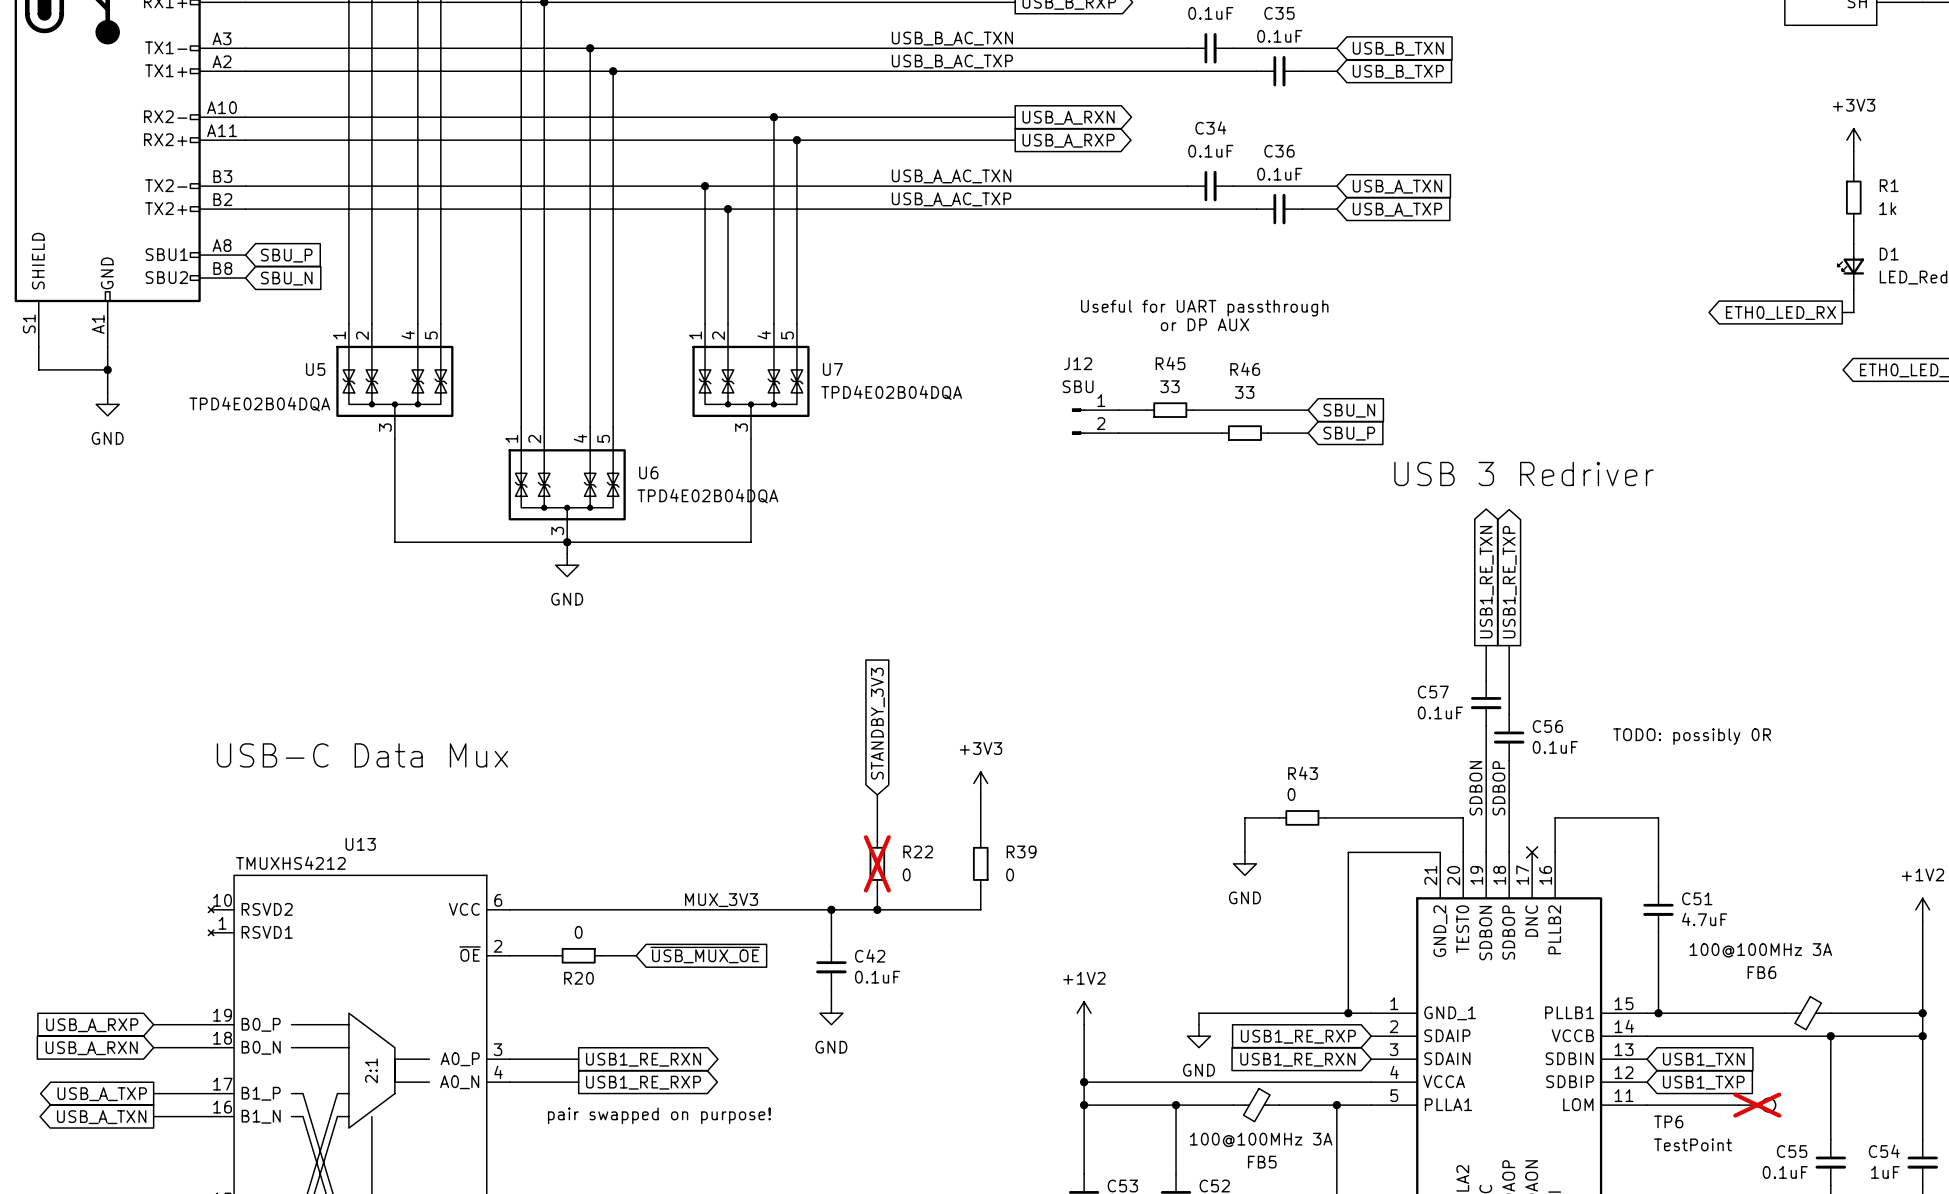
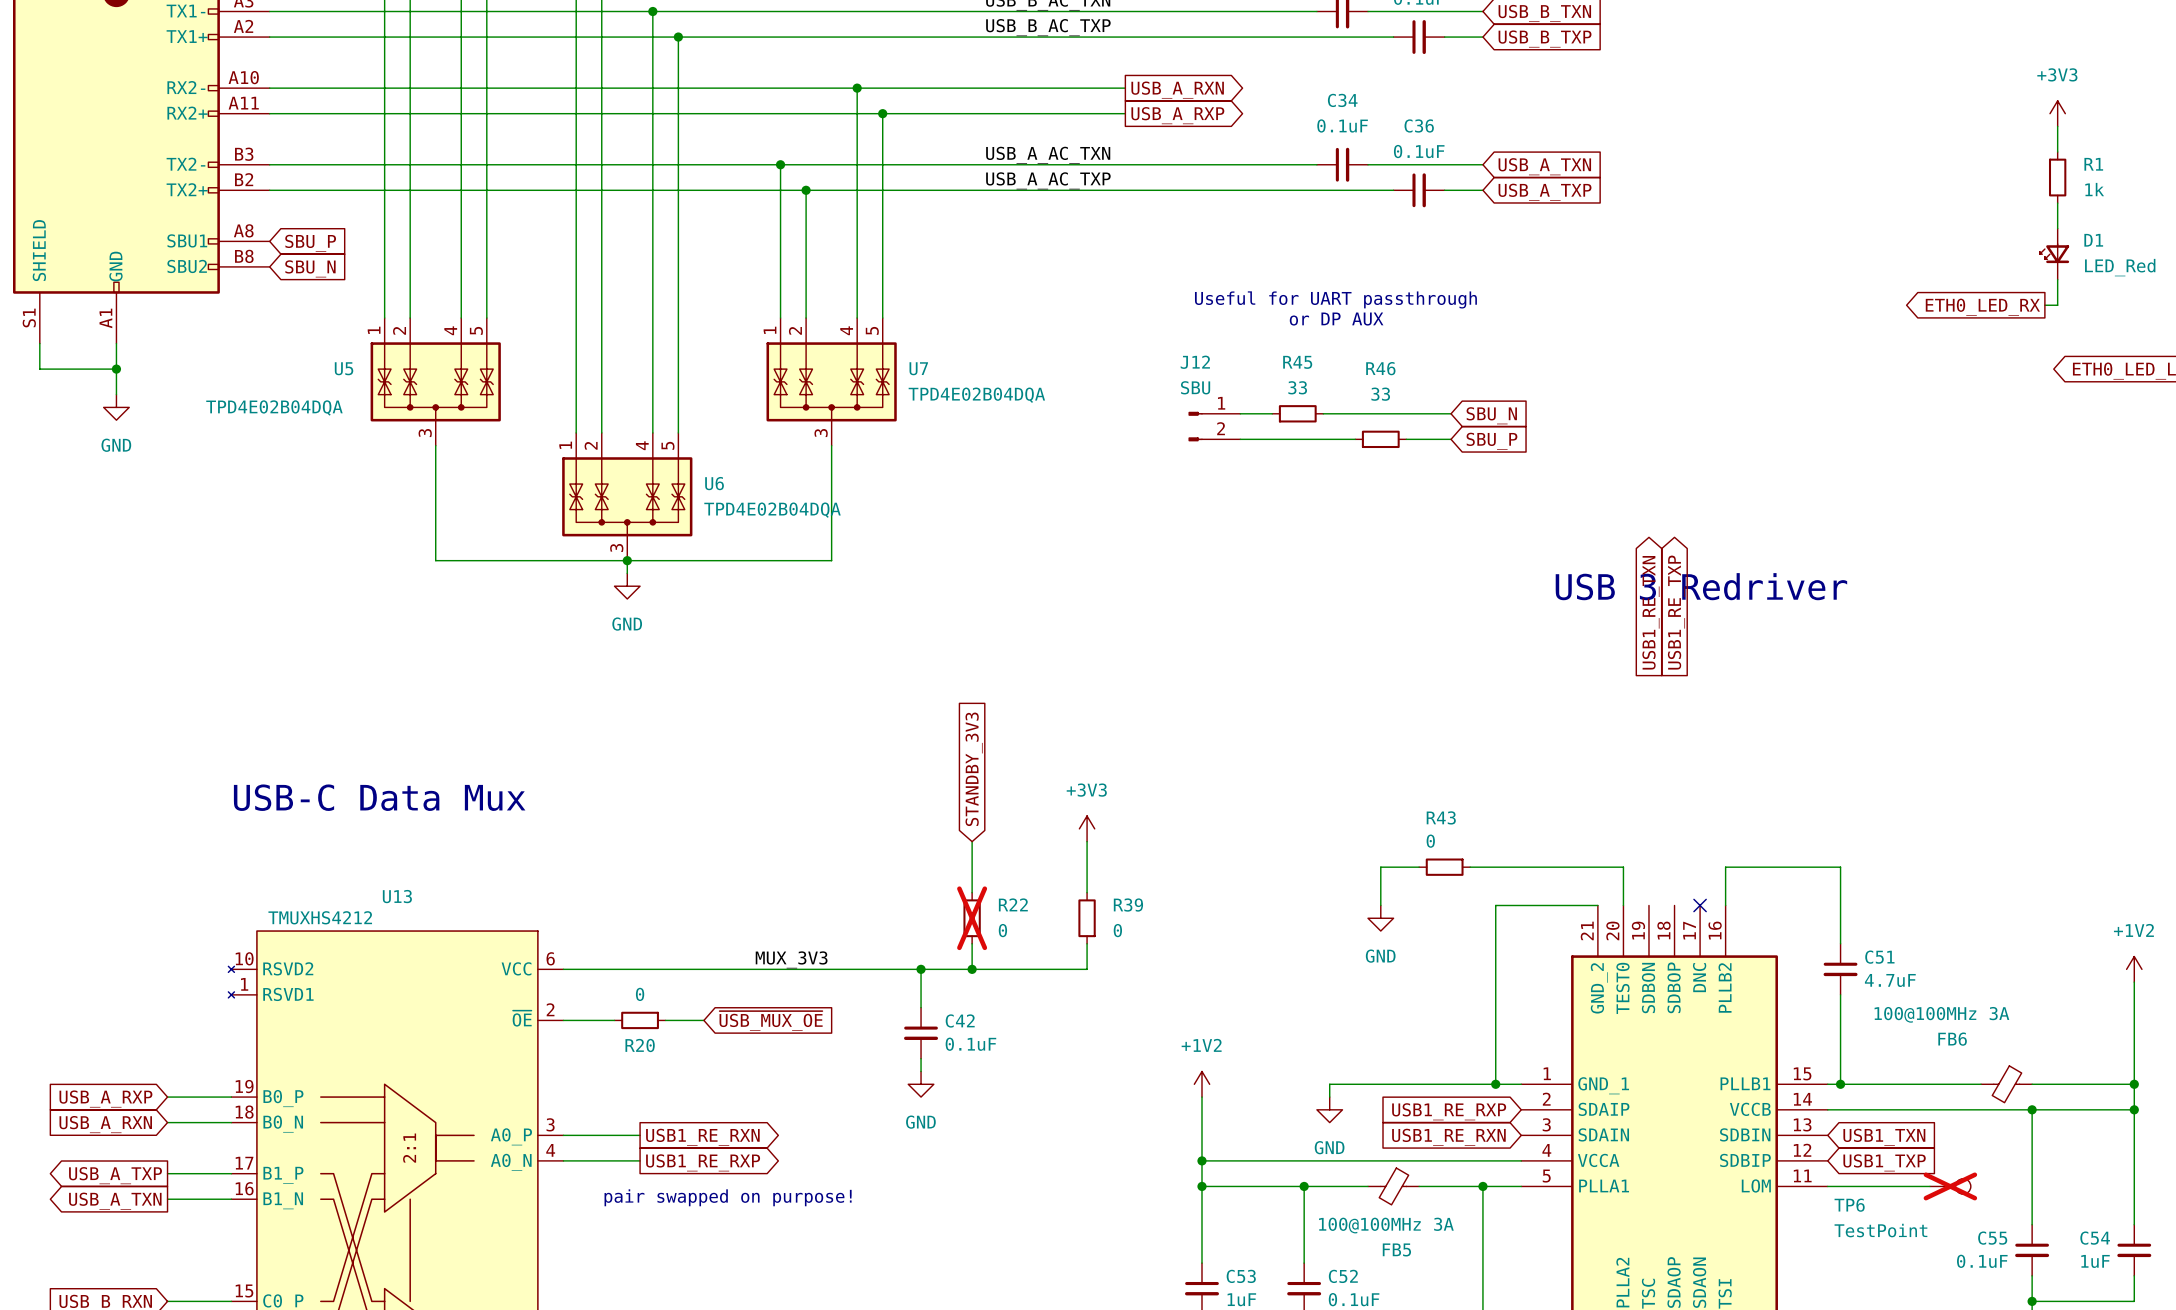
text position: USB 3 Redriver (1524, 473) -> USB 3 Redriver (1701, 586)
wire: (1486, 645) (1486, 680) -> none
wire: (1509, 645) (1509, 714) -> none
C57: 0.1uF (1486, 703) -> none
wire: (1486, 726) (1486, 852) -> none
text: TODO: possibly 0R (1692, 736) -> none
C56: 0.1uF (1509, 737) -> none
wire: (1509, 760) (1509, 852) -> none
label: SDBON (1475, 788) -> none
label: SDBOP (1498, 788) -> none

